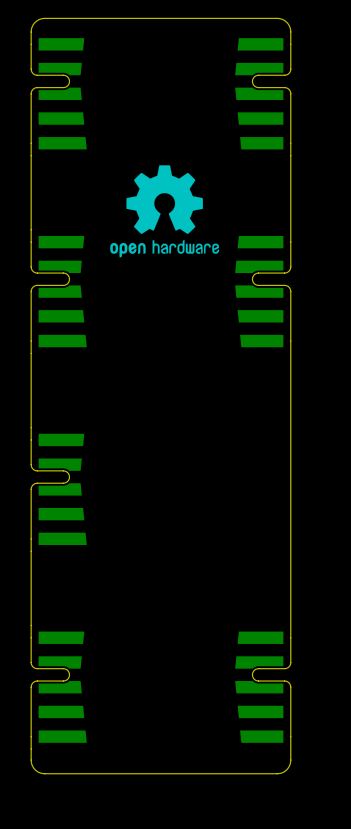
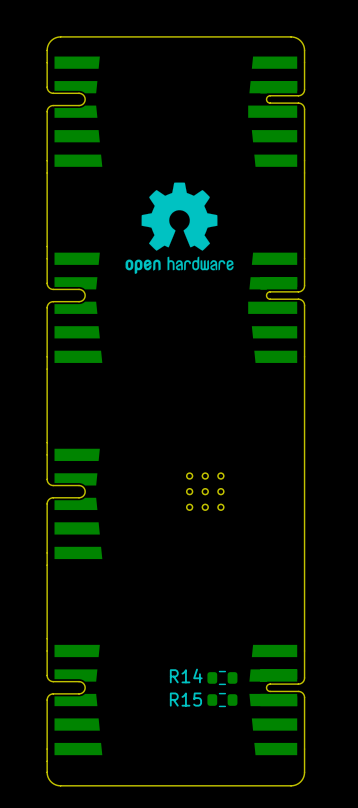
part footprint: [235, 38, 292, 150] -> [248, 56, 305, 167]
part footprint: [235, 235, 292, 348] -> [248, 252, 305, 363]
part: none -> (205, 491)
part footprint: [235, 631, 292, 743] -> [249, 644, 305, 756]
R14: none -> (222, 677)
R15: none -> (222, 700)

